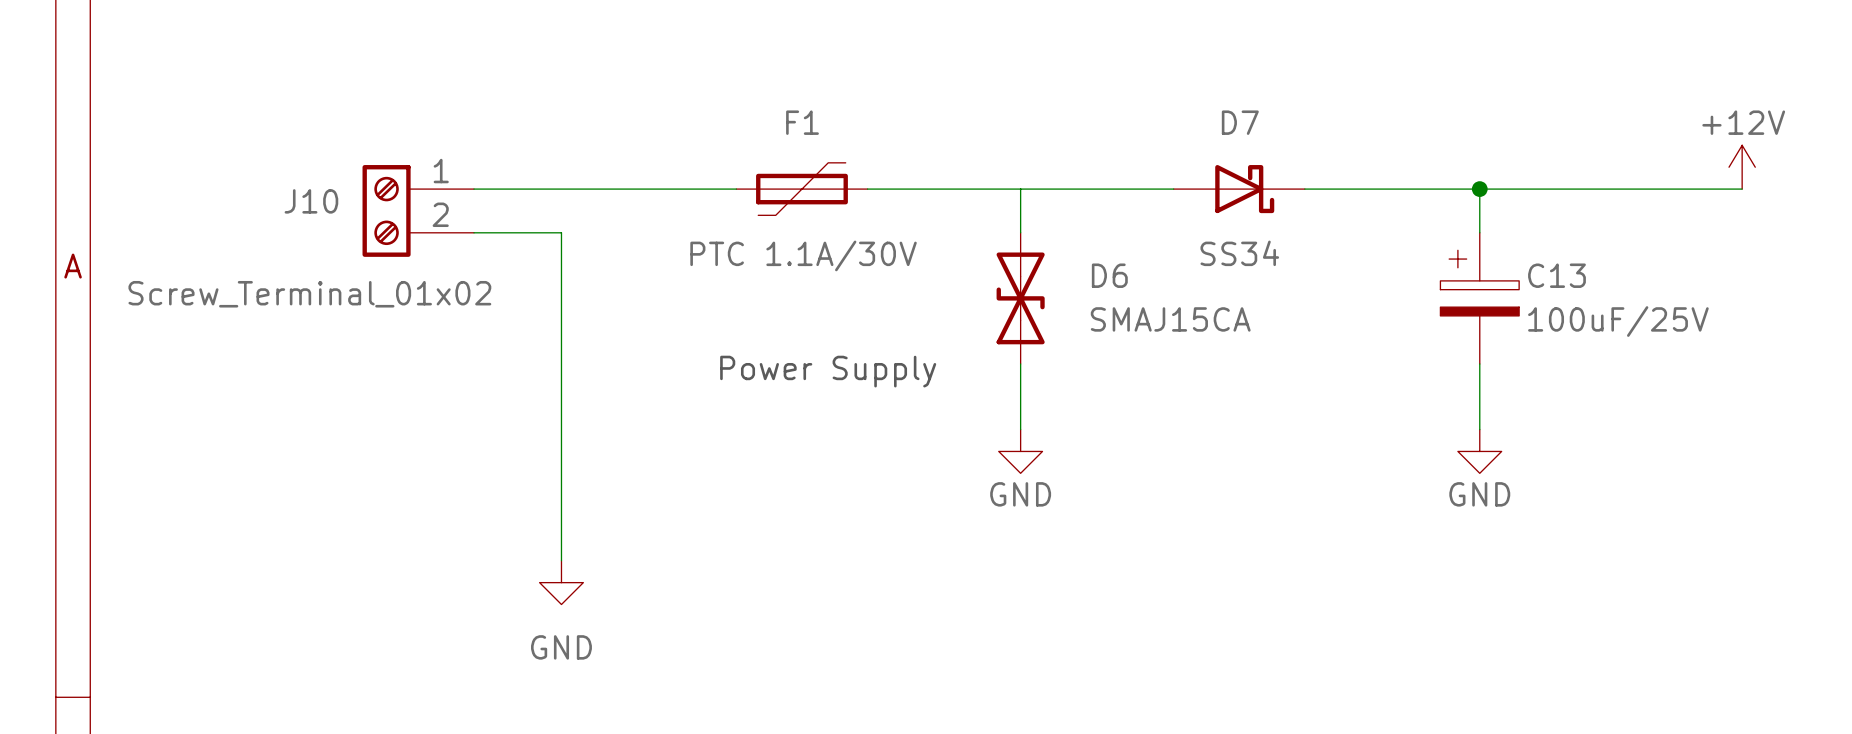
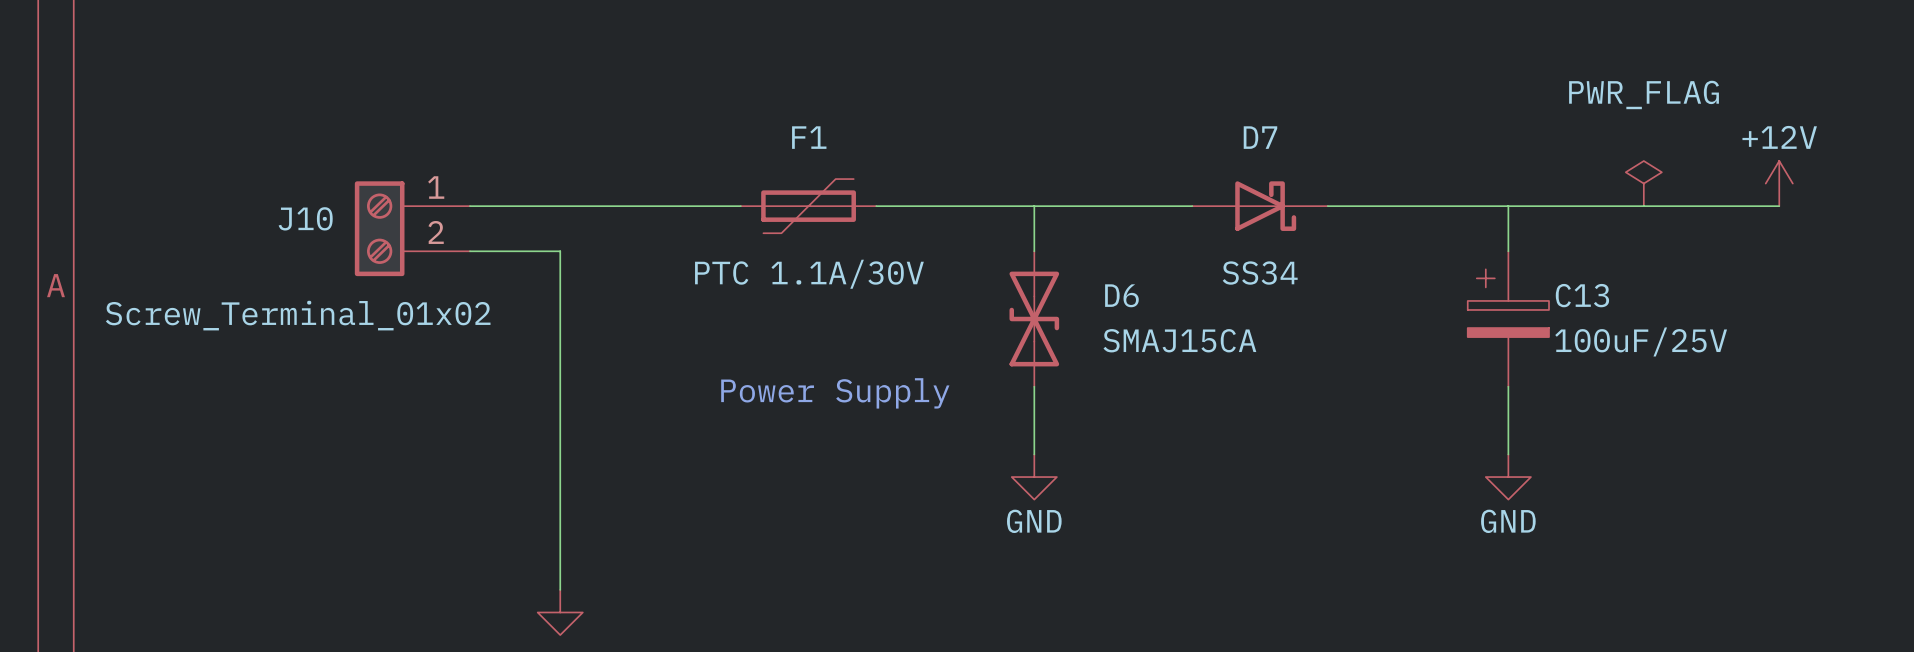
power symbol: none -> PWR_FLAG (1643, 183)
junction: (1479, 189) -> none

